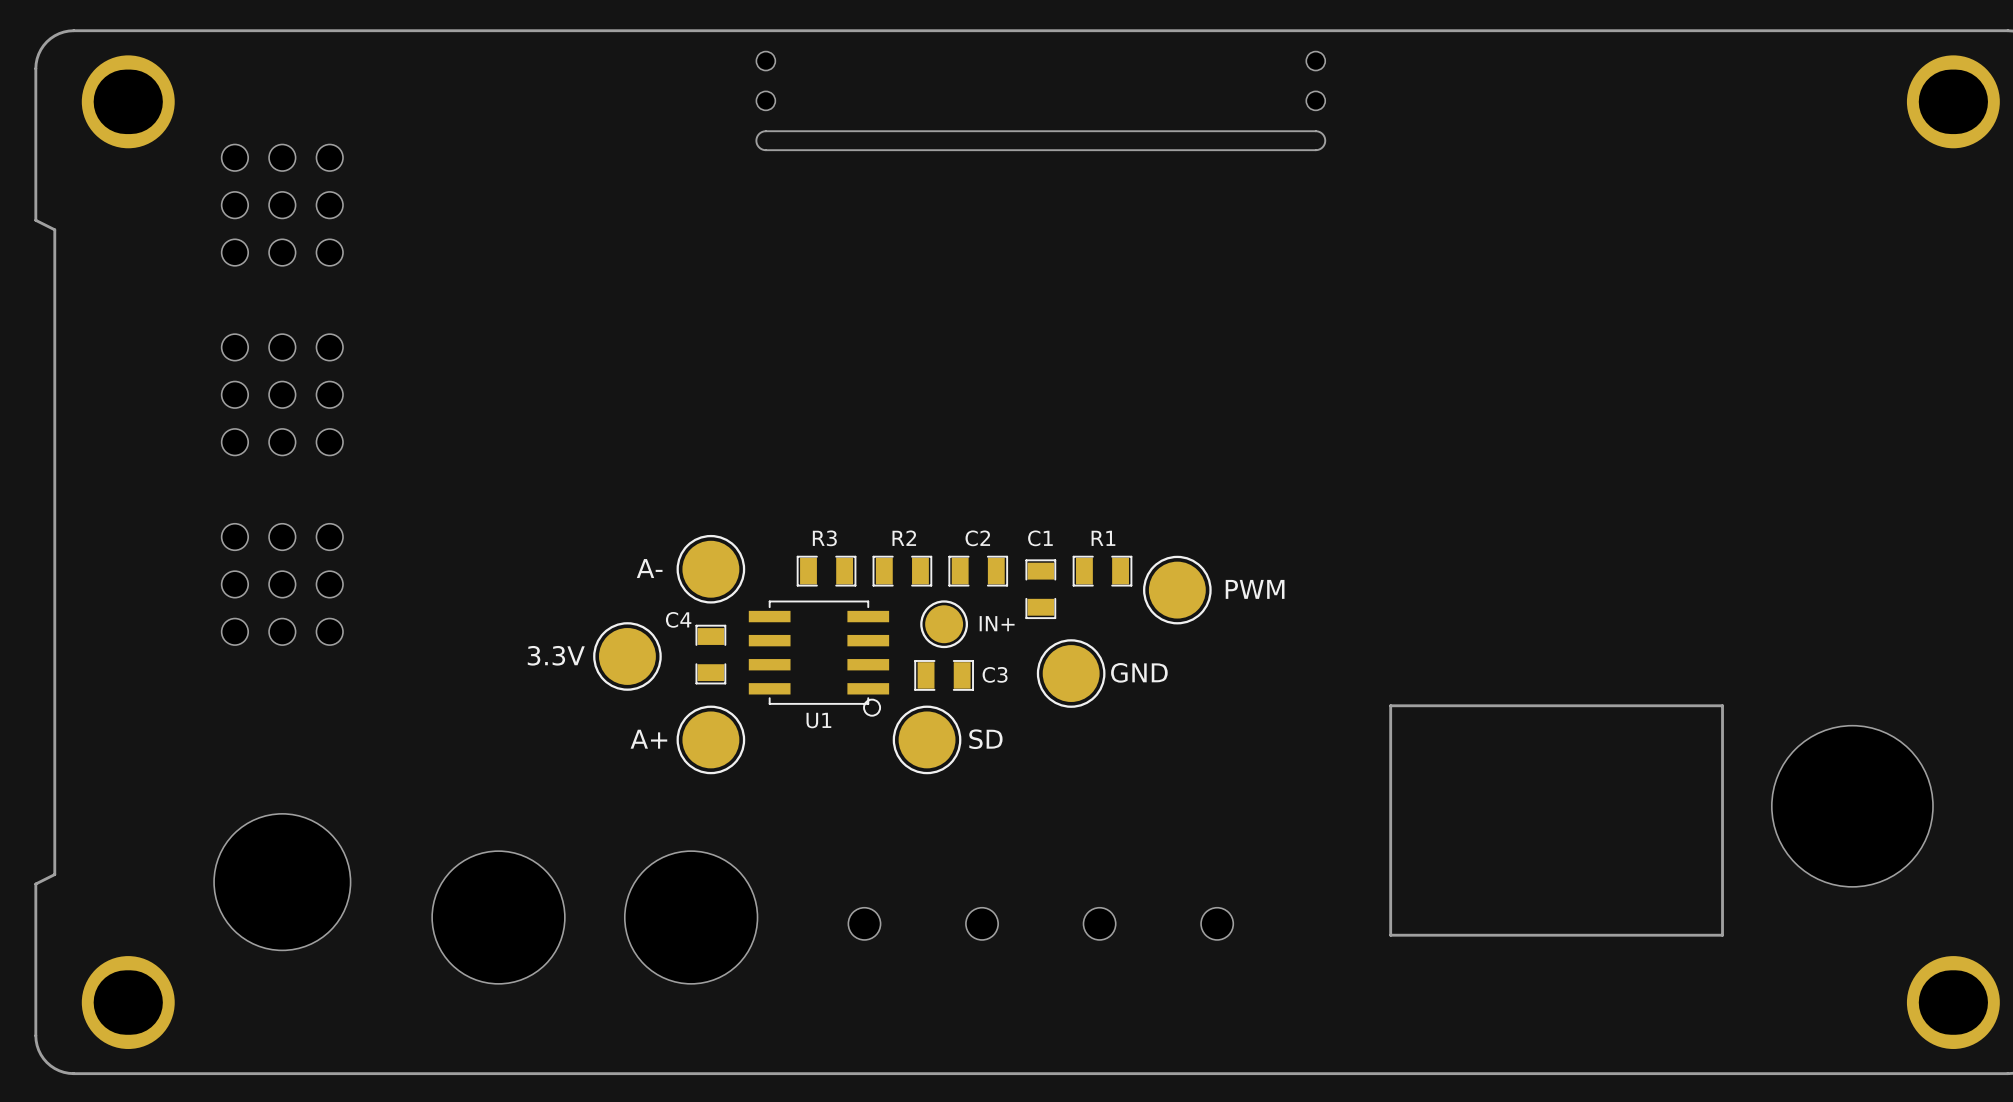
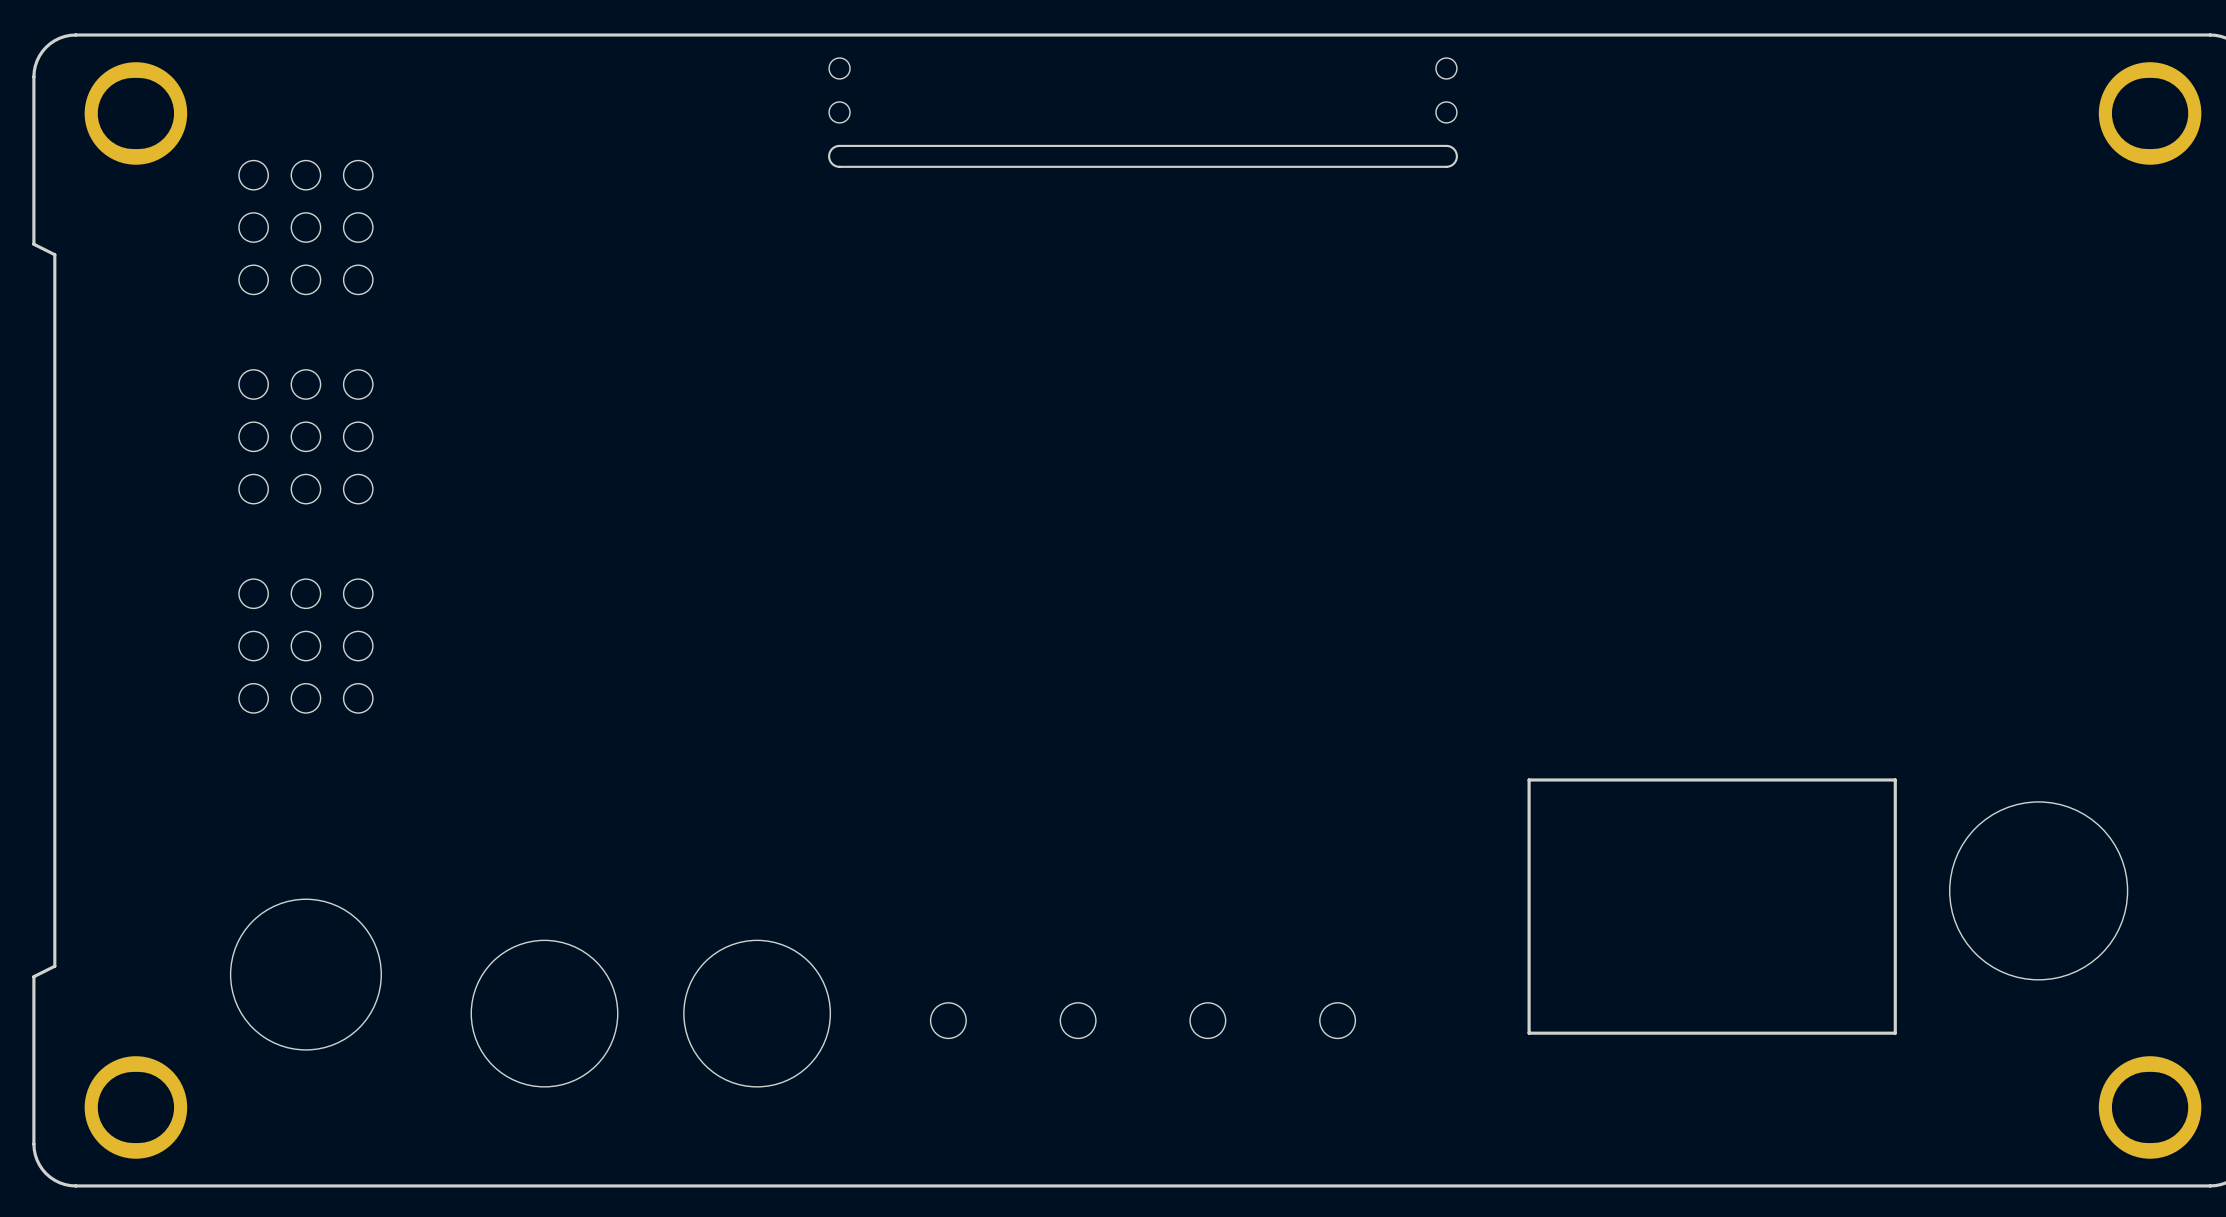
part: A- (710, 569) -> none
R3: (826, 571) -> none
R2: (902, 571) -> none
C2: (978, 571) -> none
R1: (1102, 571) -> none
C1: (1040, 589) -> none
part: PWM (1177, 590) -> none
part: IN+ (944, 624) -> none
C4: (710, 654) -> none
part: 3.3V (627, 656) -> none
U1: (818, 658) -> none
part: GND (1071, 673) -> none
C3: (944, 675) -> none
part: A+ (710, 739) -> none
part: SD (927, 739) -> none

